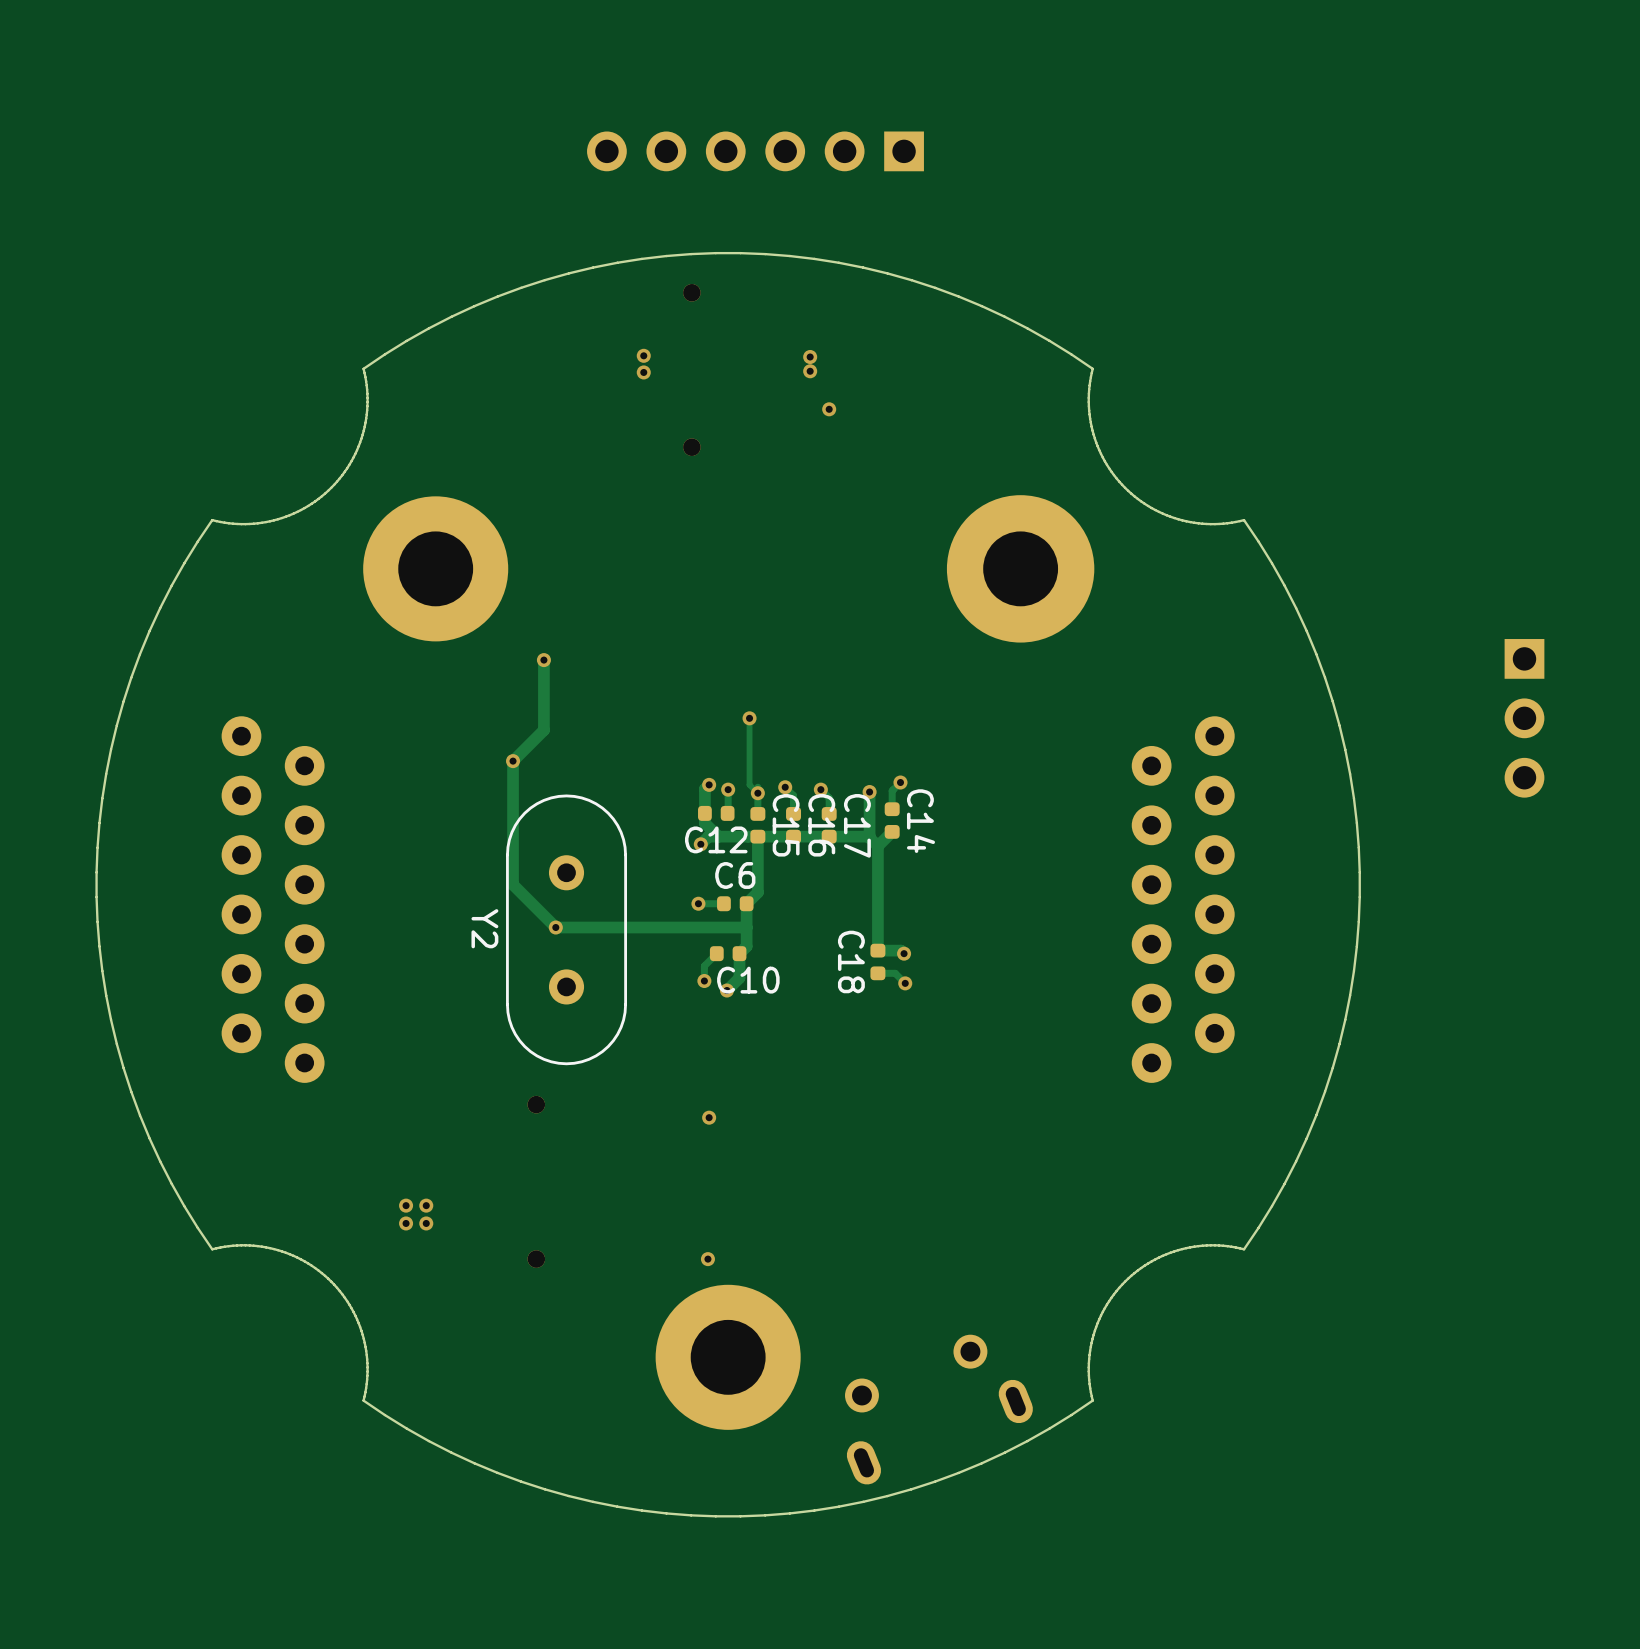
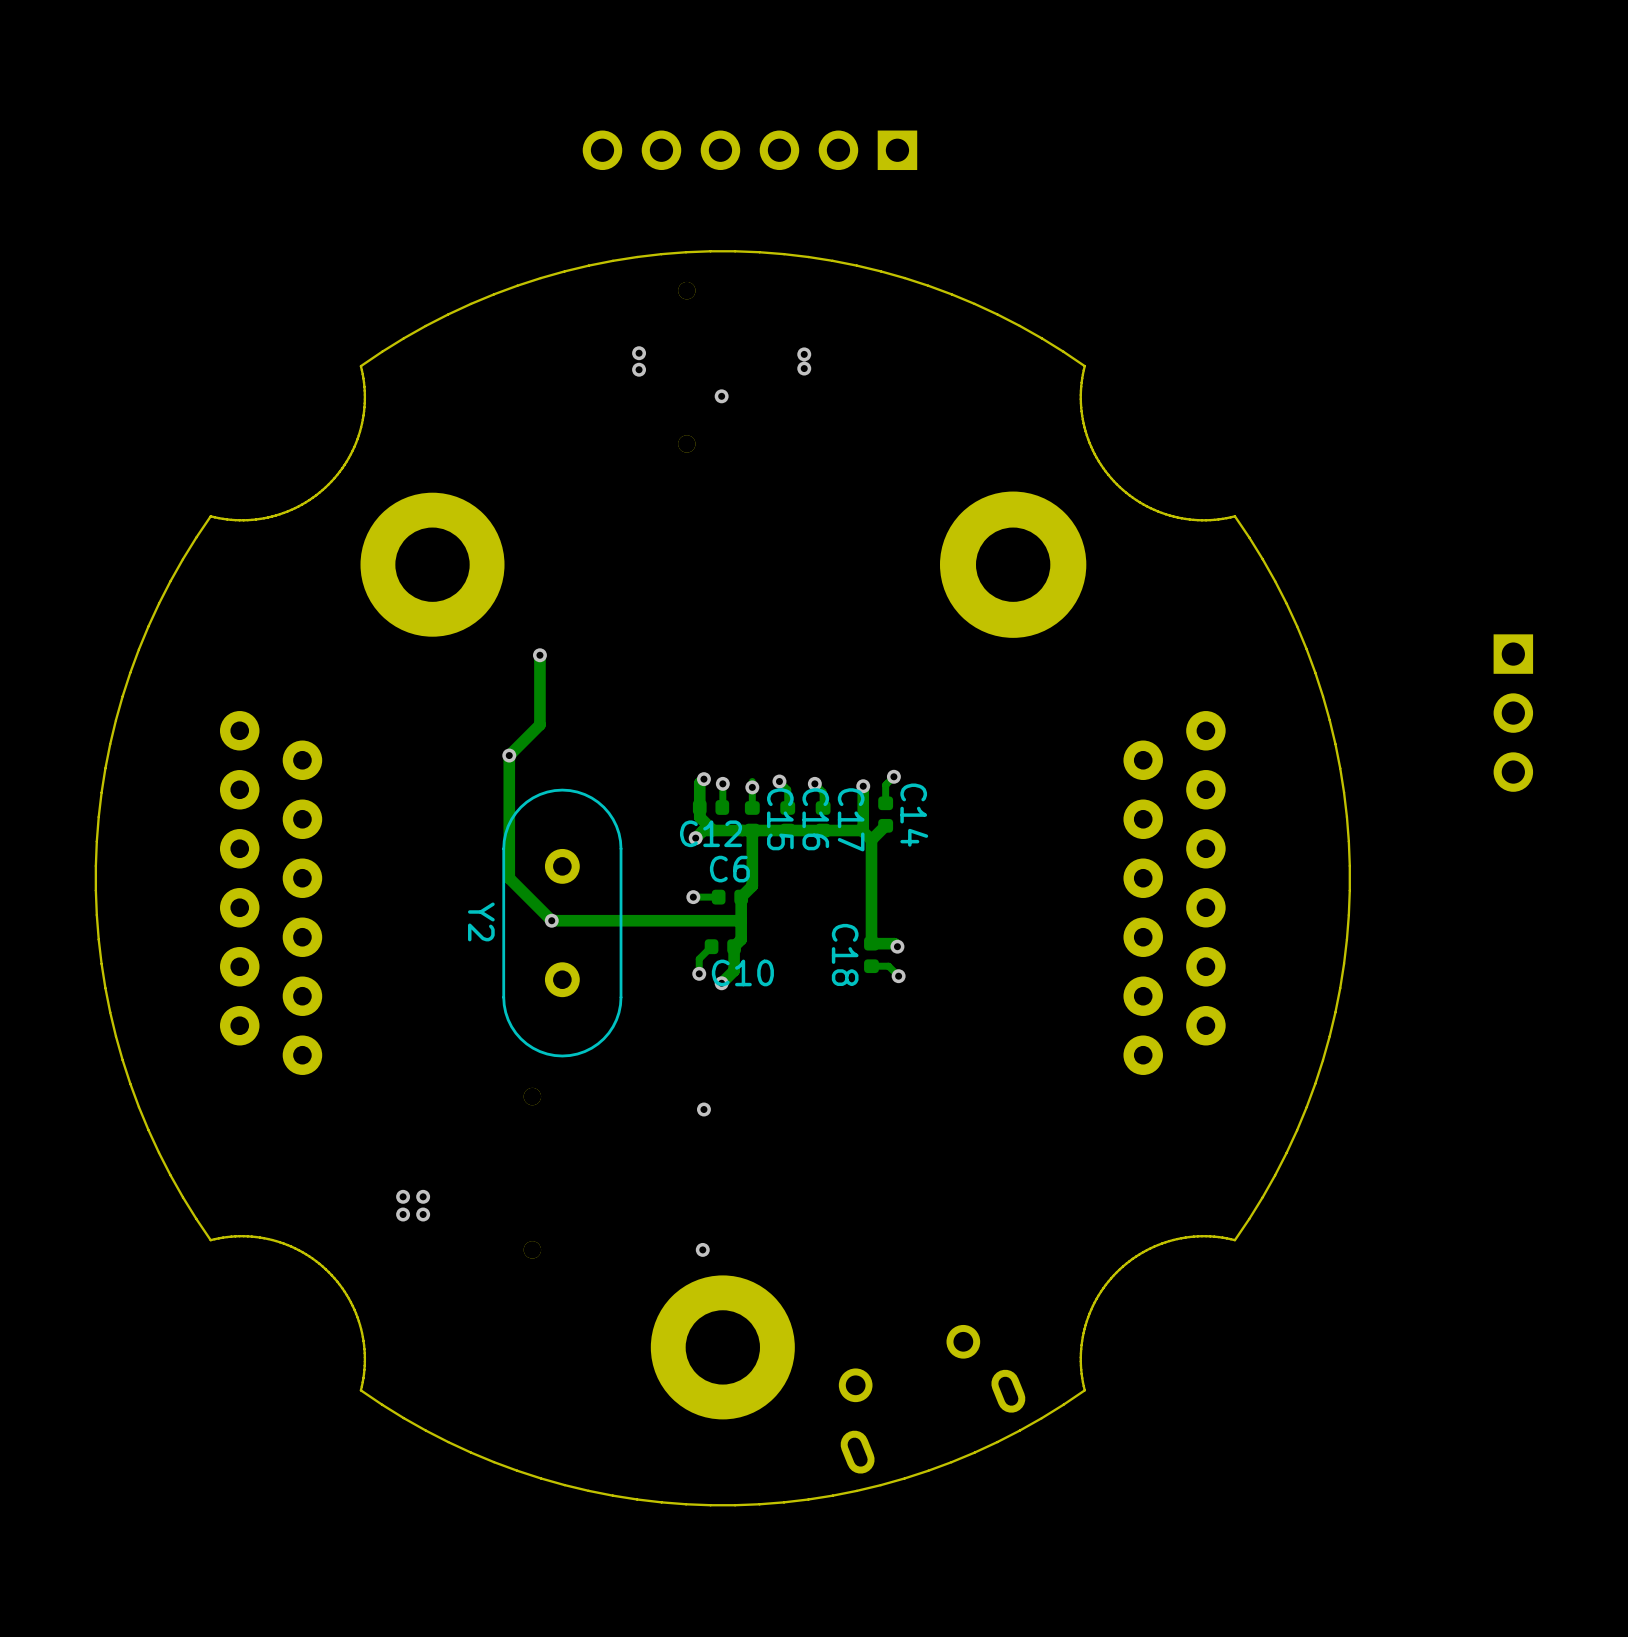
via position: (829, 409) -> (721, 396)
track: (749, 718) (749, 784) (757, 793) -> none
via: (749, 718) -> none

